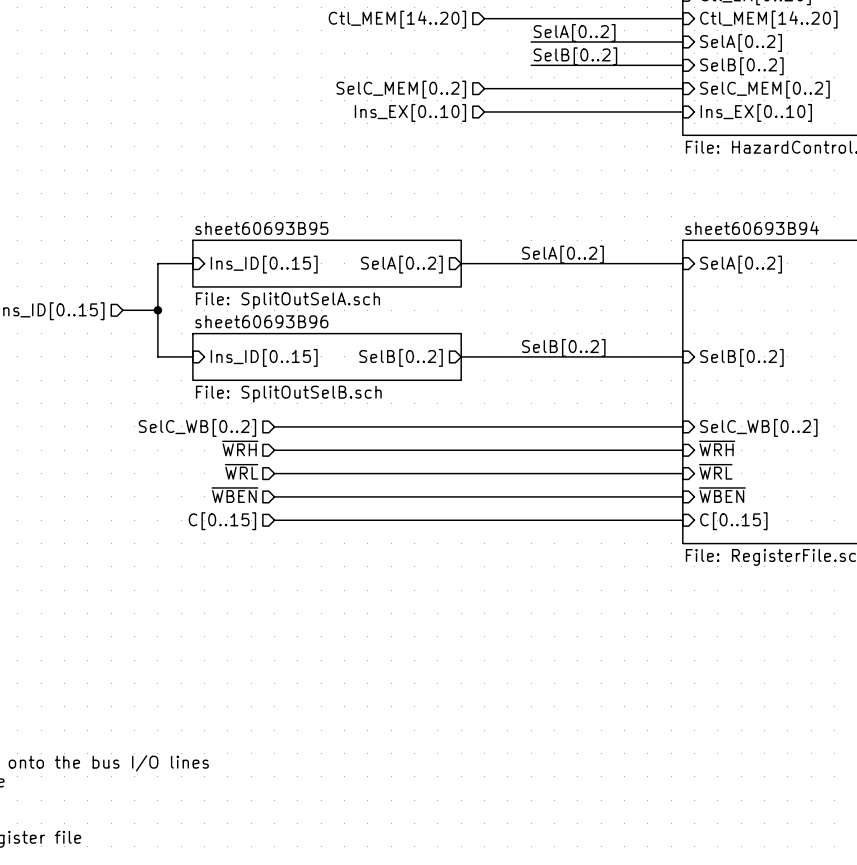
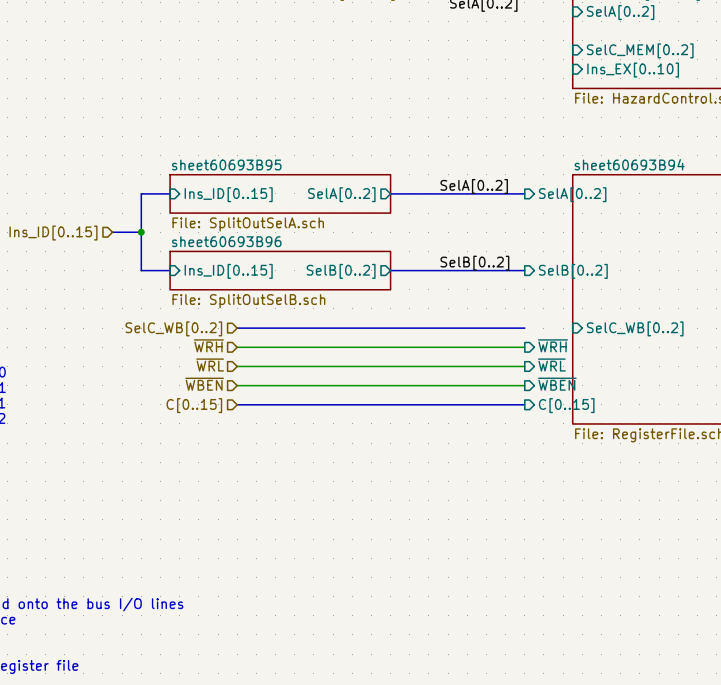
bus: (531, 42) (682, 42) -> none
label: SelB[0..2] (575, 56) -> none
bus: (531, 65) (682, 65) -> none
sheet pin: SelB[0..2] (741, 66) -> none
bus: (484, 88) (682, 88) -> none
hierarchical label: SelC_MEM[0..2] (401, 89) -> none
bus: (484, 111) (682, 111) -> none
hierarchical label: Ins_EX[0..10] (410, 112) -> none
bus: (624, 263) (682, 263) -> none
sheet pin position: SelA[0..2] (741, 264) -> SelA[0..2] (572, 194)
bus: (624, 356) (682, 356) -> none
sheet pin position: SelB[0..2] (741, 357) -> SelB[0..2] (573, 271)
bus: (624, 426) (682, 426) -> none
sheet pin position: ~{WRH} (717, 448) -> ~{WRH} (553, 345)
wire: (624, 450) (682, 450) -> none
sheet pin position: ~{WRL} (715, 471) -> ~{WRL} (551, 365)
wire: (624, 473) (682, 473) -> none
sheet pin position: ~{WBEN} (722, 495) -> ~{WBEN} (557, 384)
wire: (624, 496) (682, 496) -> none
bus: (624, 520) (682, 520) -> none
sheet pin position: C[0..15] (733, 521) -> C[0..15] (566, 405)

